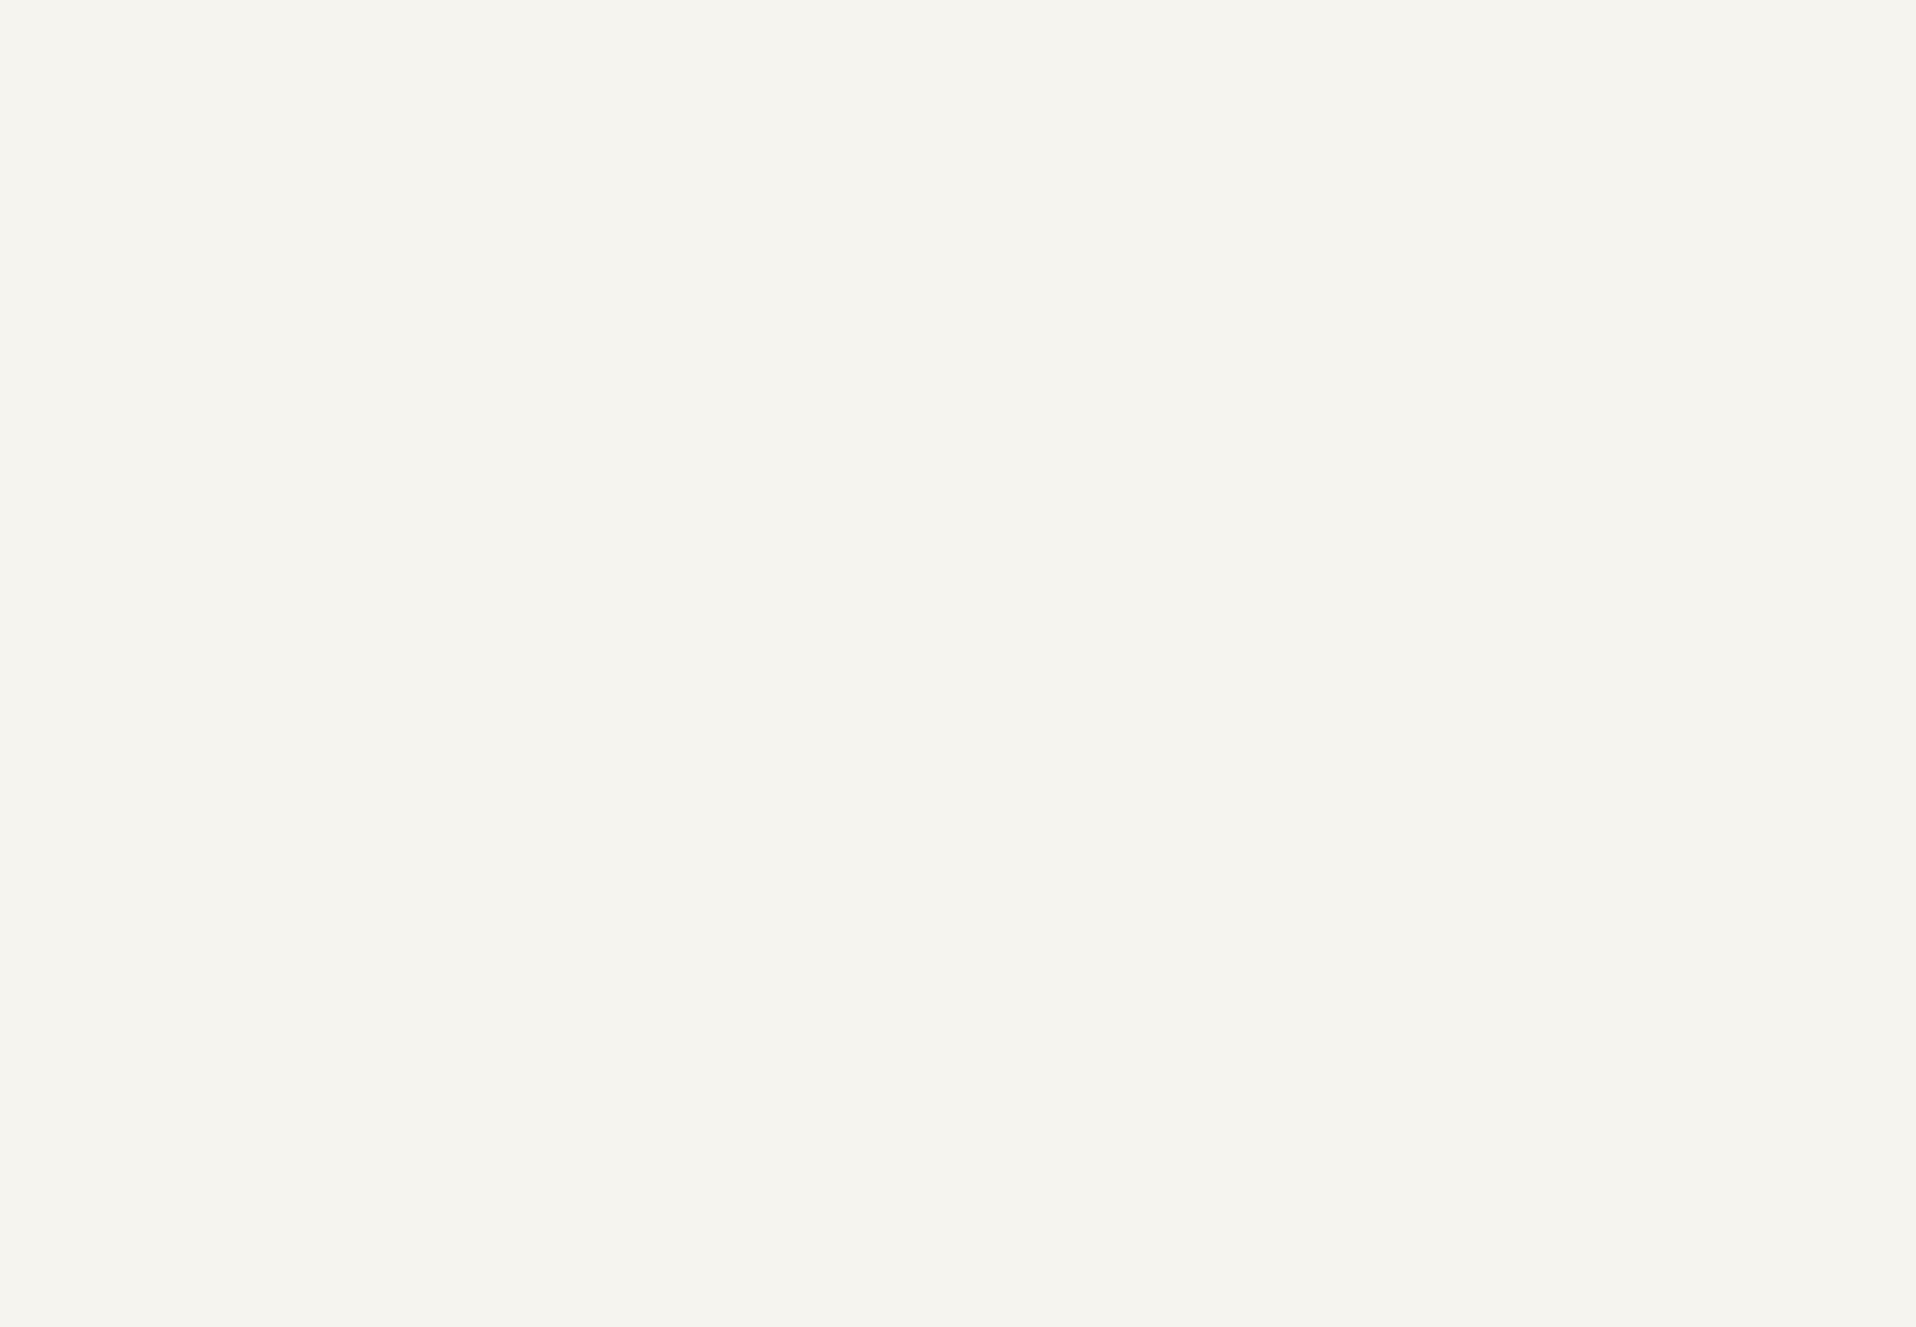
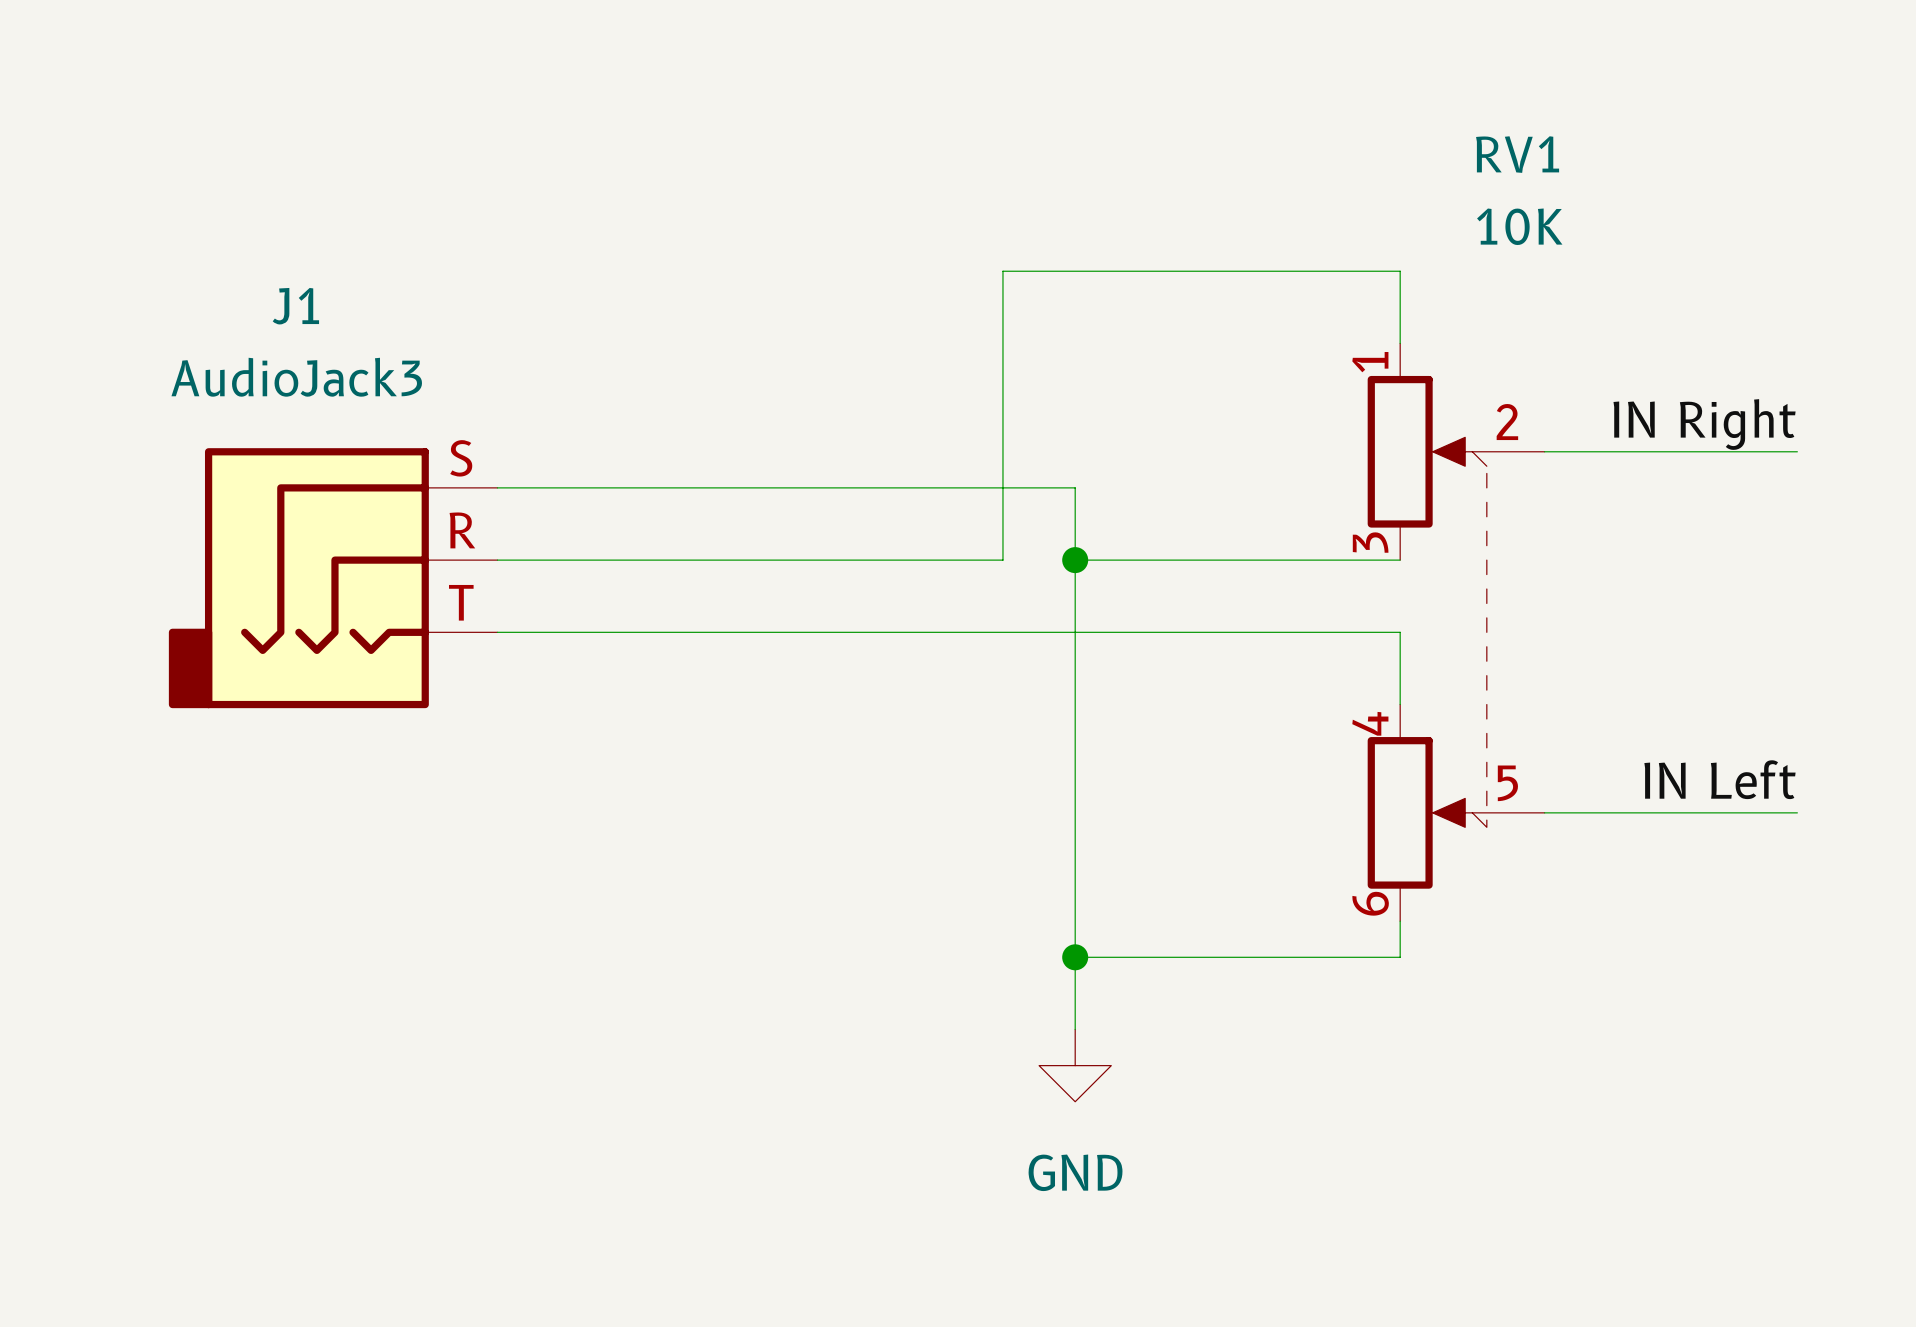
wire: none -> (1400, 343) (1400, 271) (1002, 271) (1002, 560) (497, 560)
label: none -> IN Right (1704, 424)
wire: none -> (1544, 451) (1797, 451)
wire: none -> (497, 487) (1075, 487) (1075, 1029)
wire: none -> (1075, 560) (1400, 560)
junction: none -> (1075, 560)
J1: none -> AudioJack3 (333, 578)
wire: none -> (497, 632) (1400, 632) (1400, 704)
RV1: none -> 10K (1456, 632)
label: none -> IN Left (1719, 779)
wire: none -> (1544, 812) (1797, 812)
wire: none -> (1400, 921) (1400, 957) (1075, 957)
junction: none -> (1075, 957)
power symbol: none -> GND (1075, 1065)

